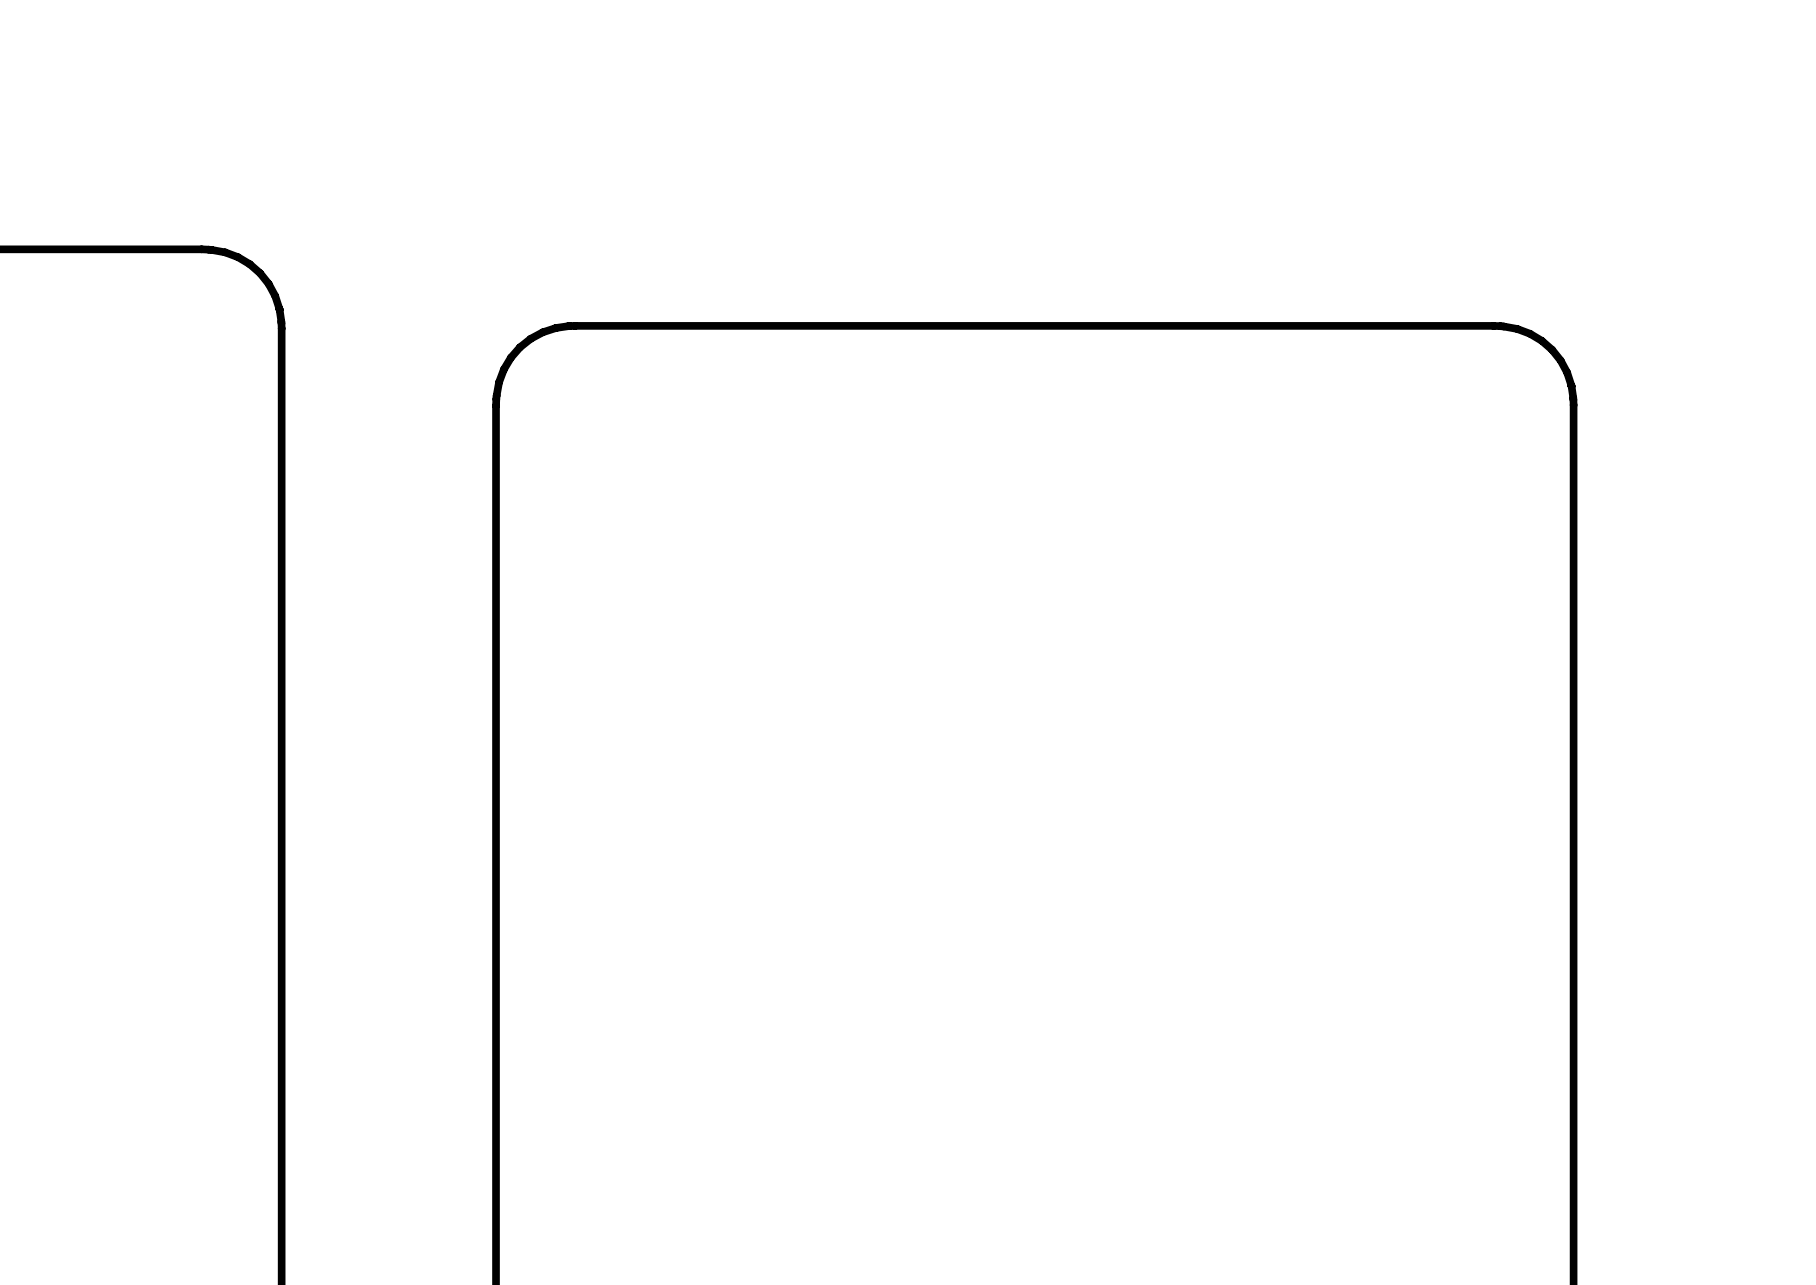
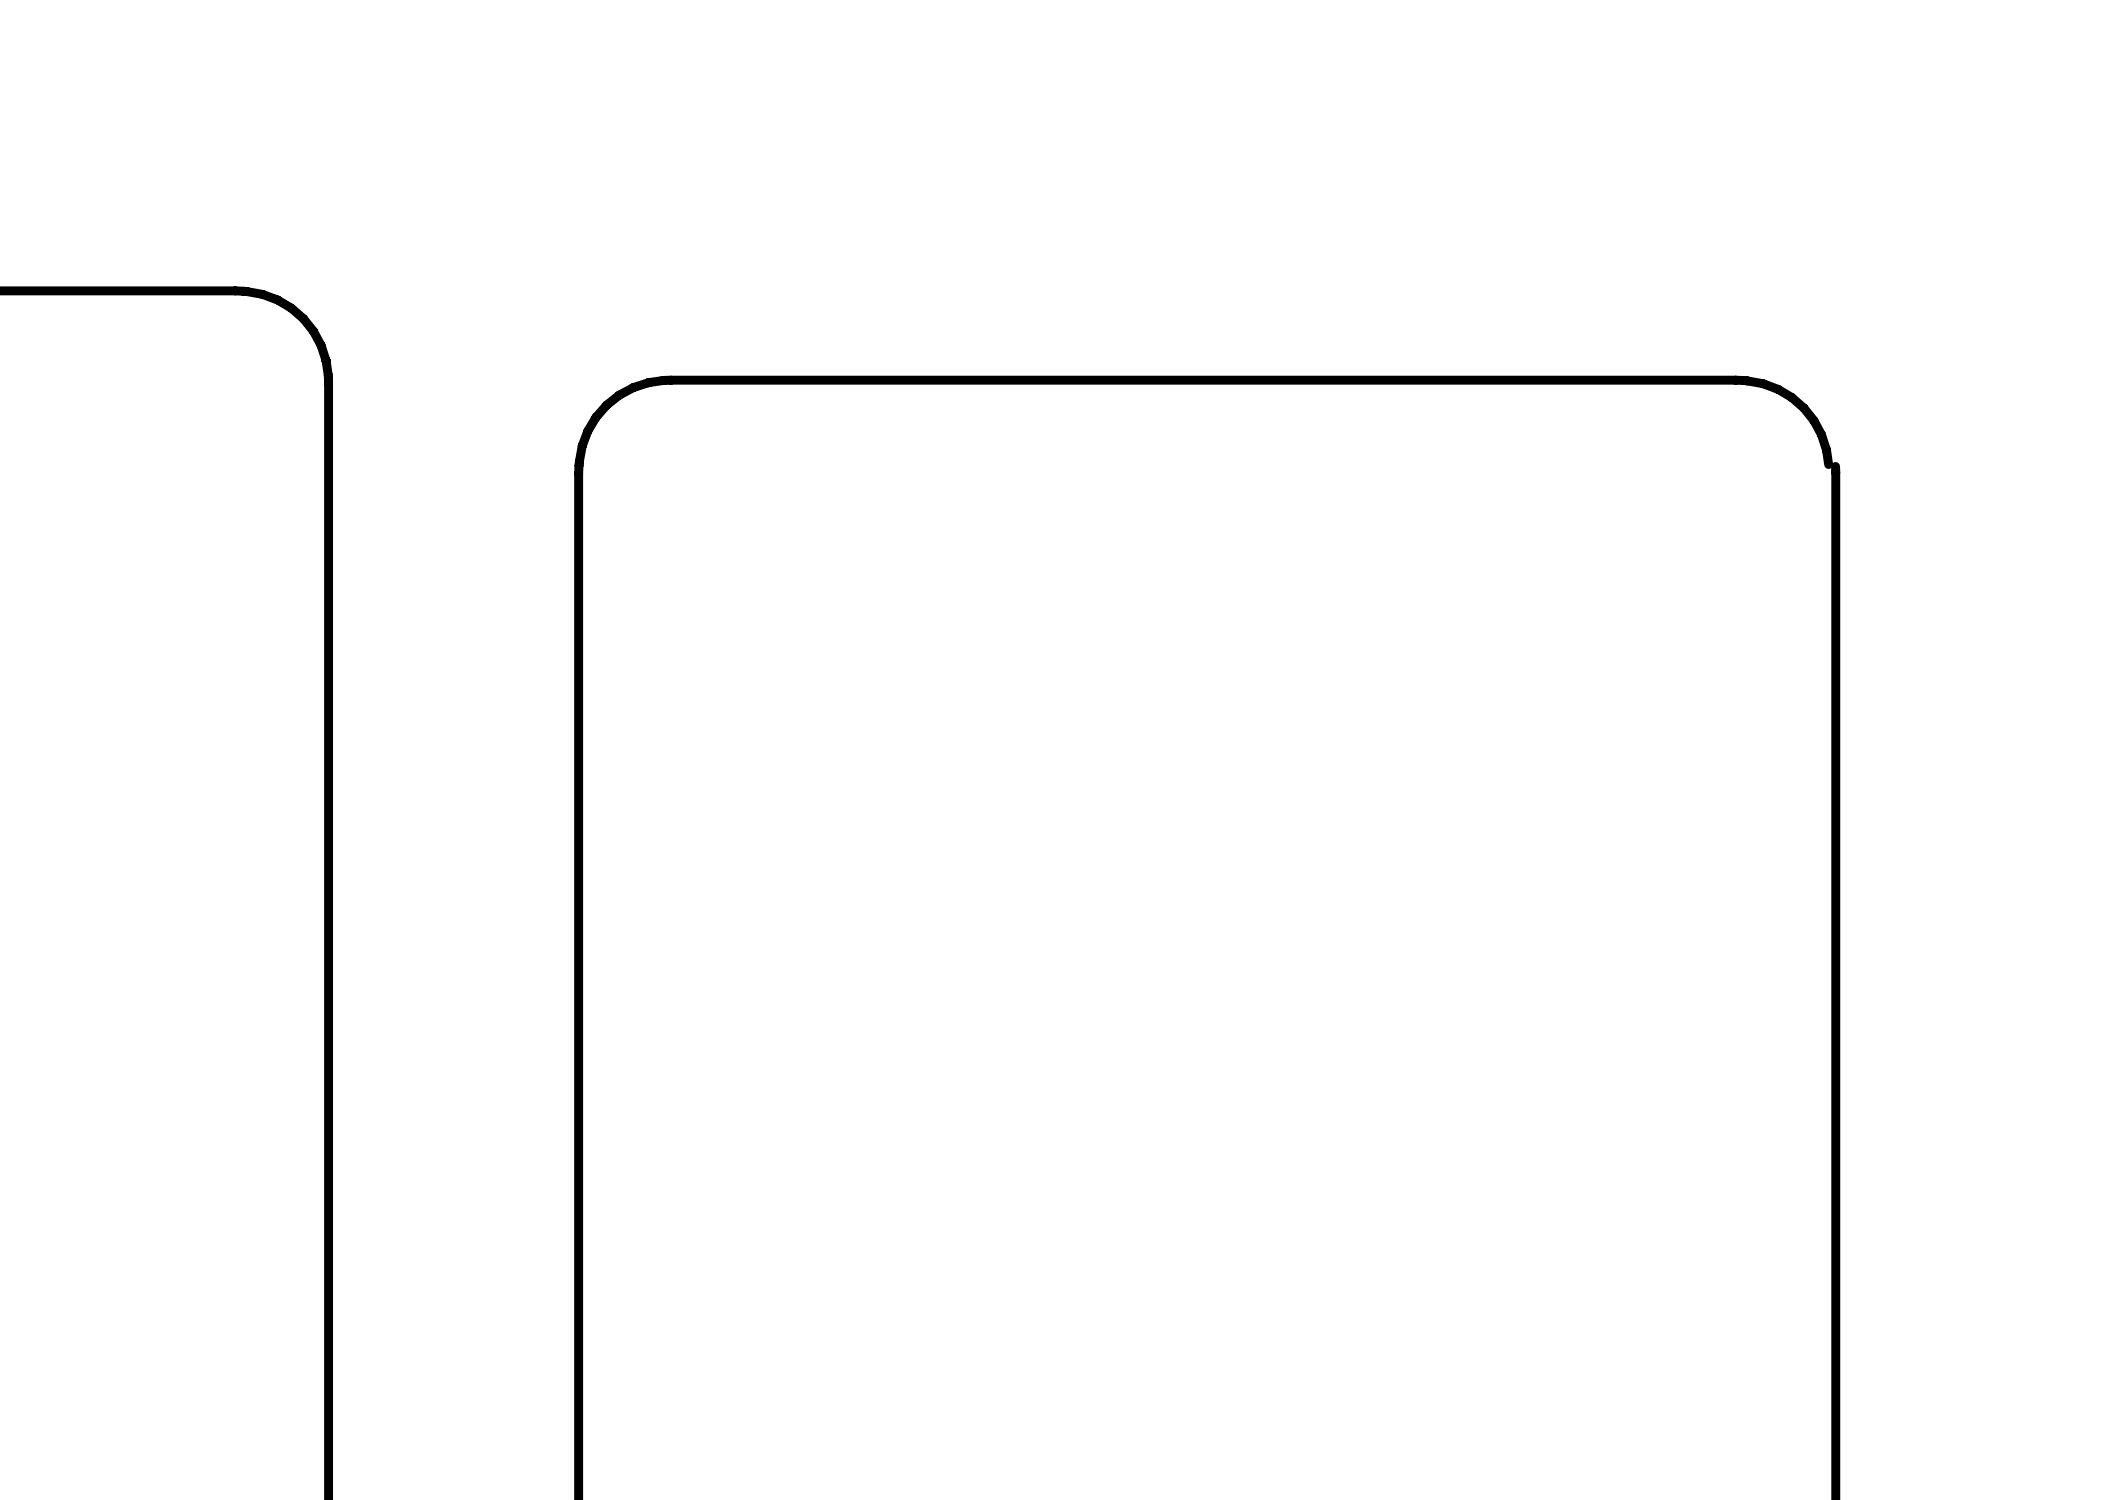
board edge: (1487, 325) (1517, 328) (1541, 340) (1560, 360) (1567, 372) (1573, 398) -> (1735, 380) (1763, 383) (1791, 397) (1813, 420) (1826, 449)
board edge: none -> (1826, 450) (1828, 464)

